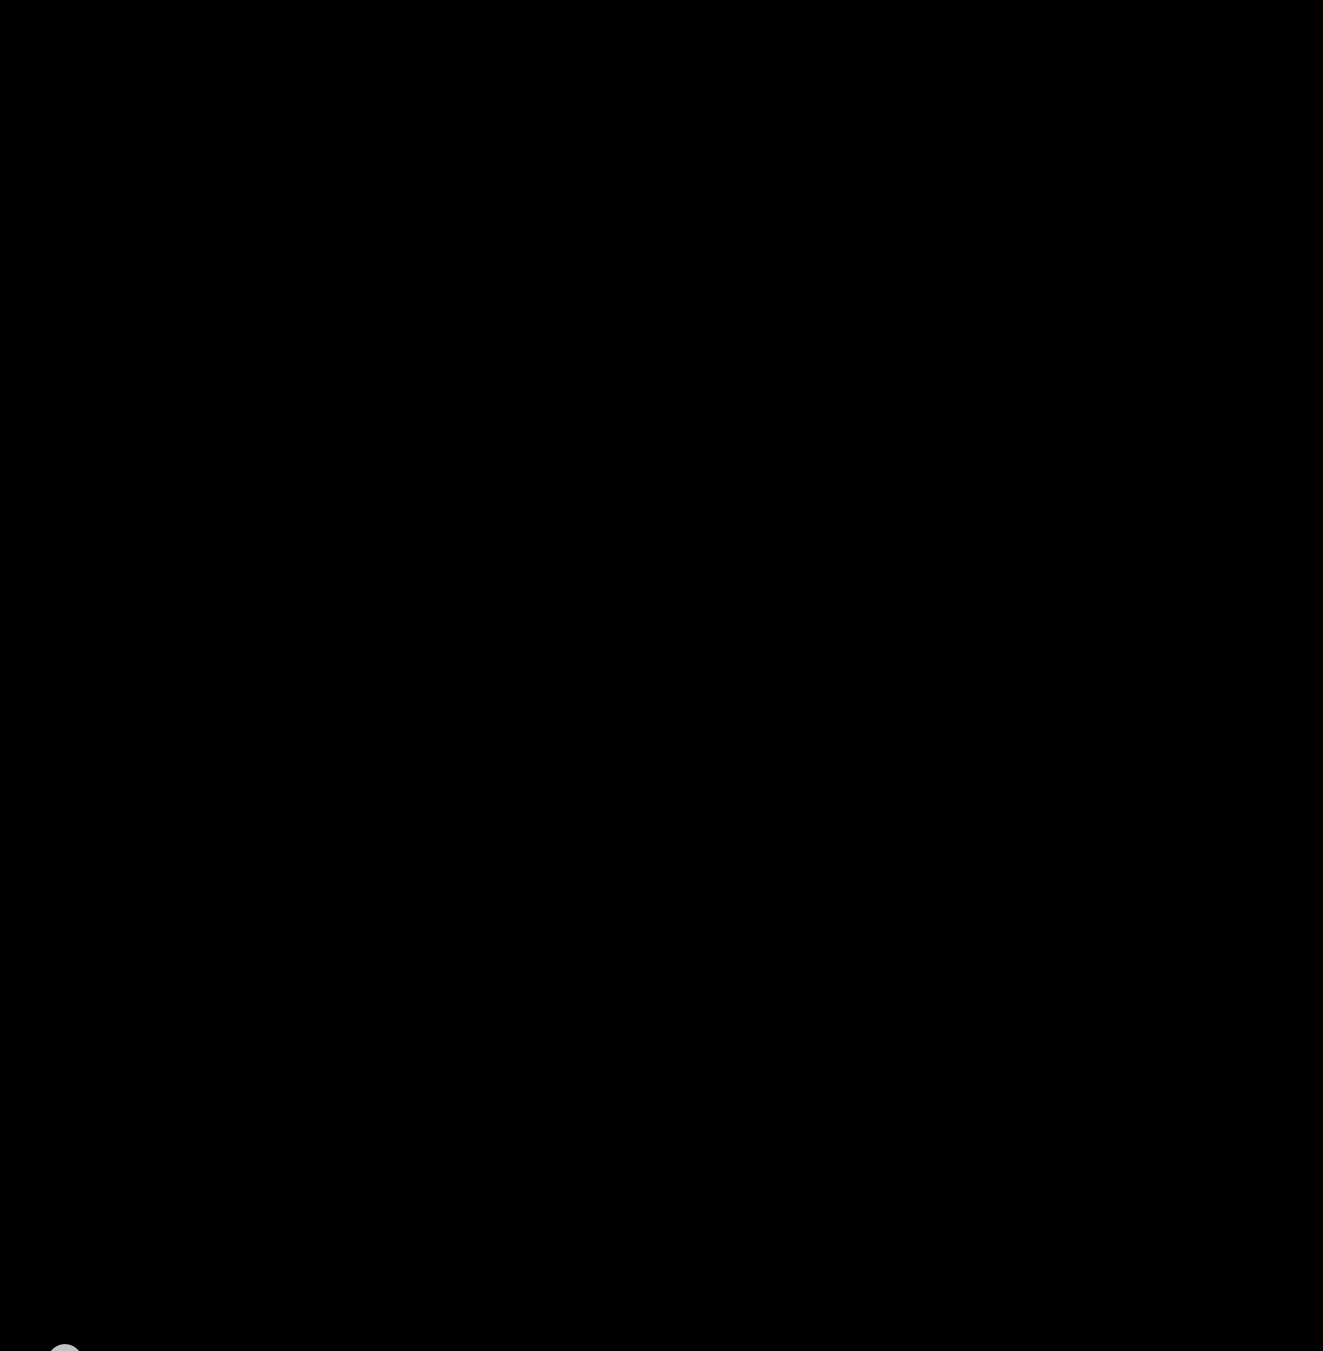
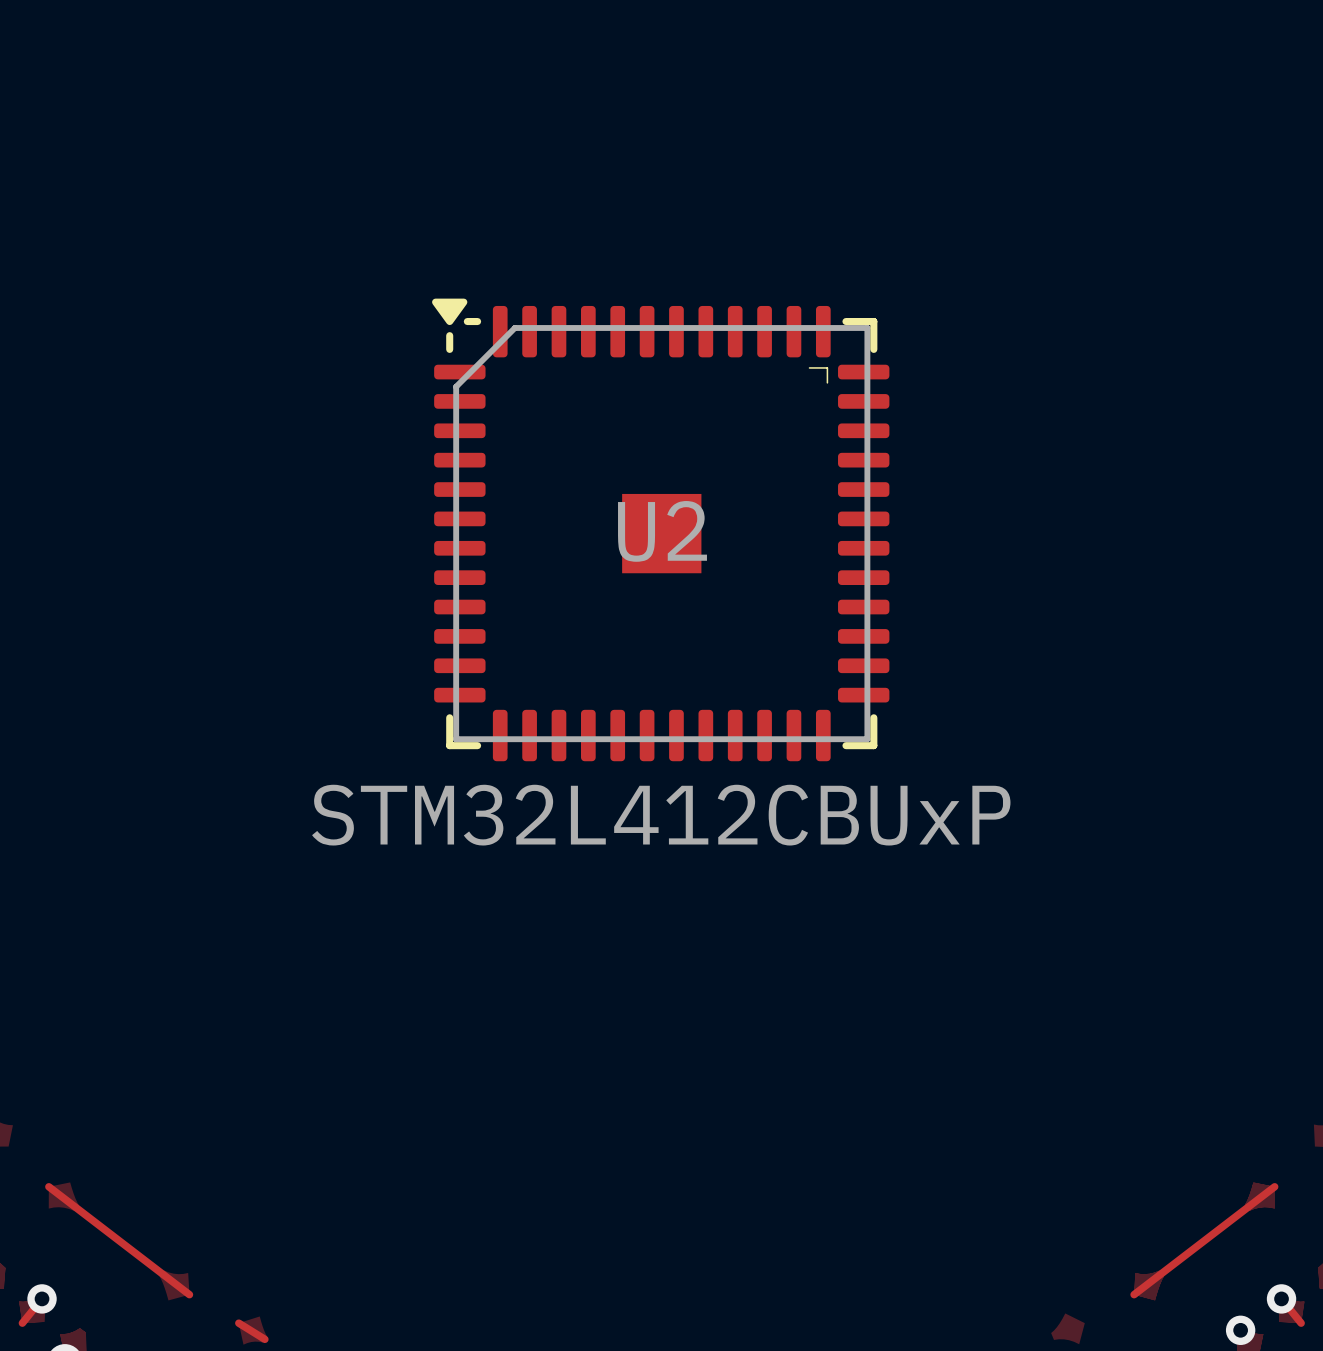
U2: none -> STM32L412CBUxP (660, 529)
track: none -> (48, 1186) (189, 1294)
track: none -> (1274, 1186) (1134, 1294)
track: none -> (42, 1298) (22, 1323)
via: none -> (42, 1298)
track: none -> (1281, 1298) (1301, 1323)
via: none -> (1281, 1298)
track: none -> (238, 1323) (264, 1339)
via: none -> (1240, 1330)

